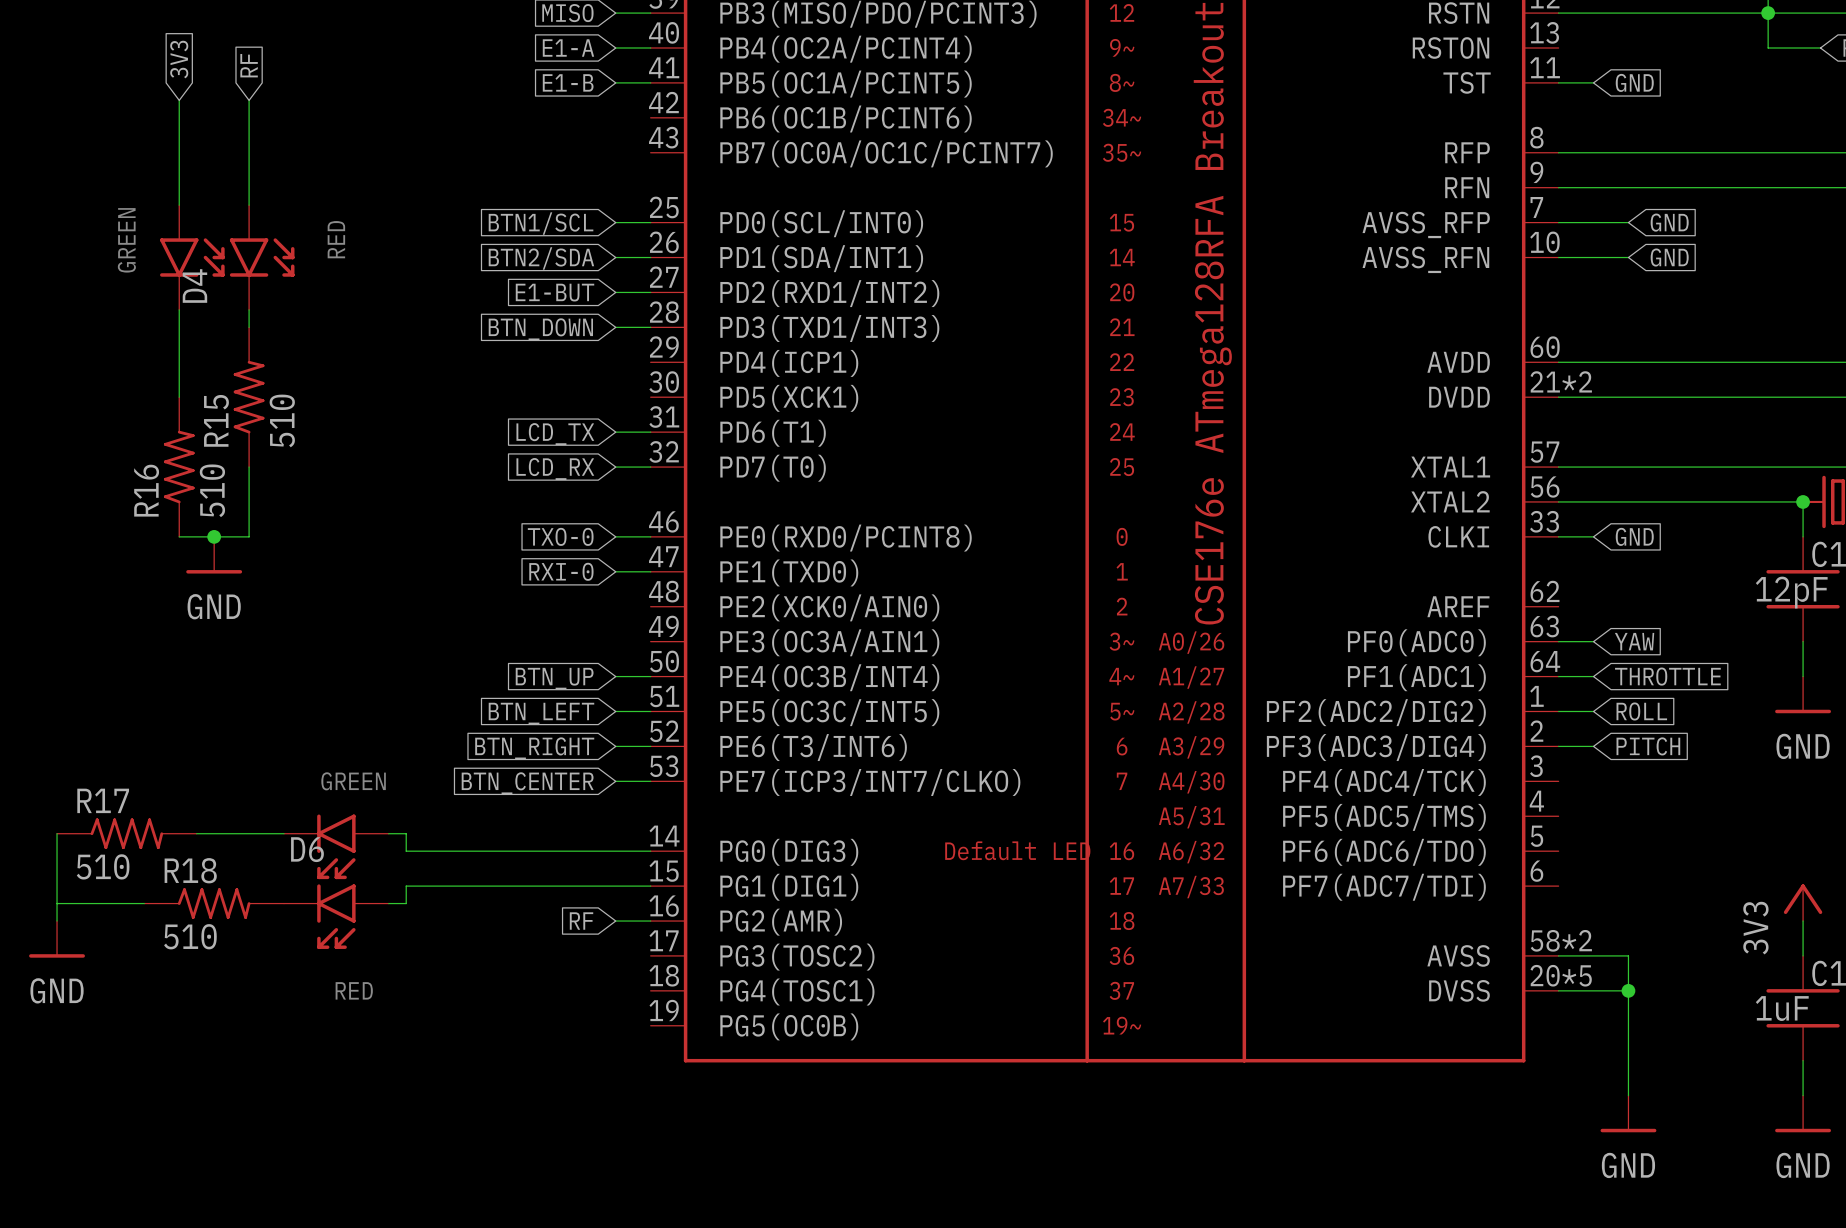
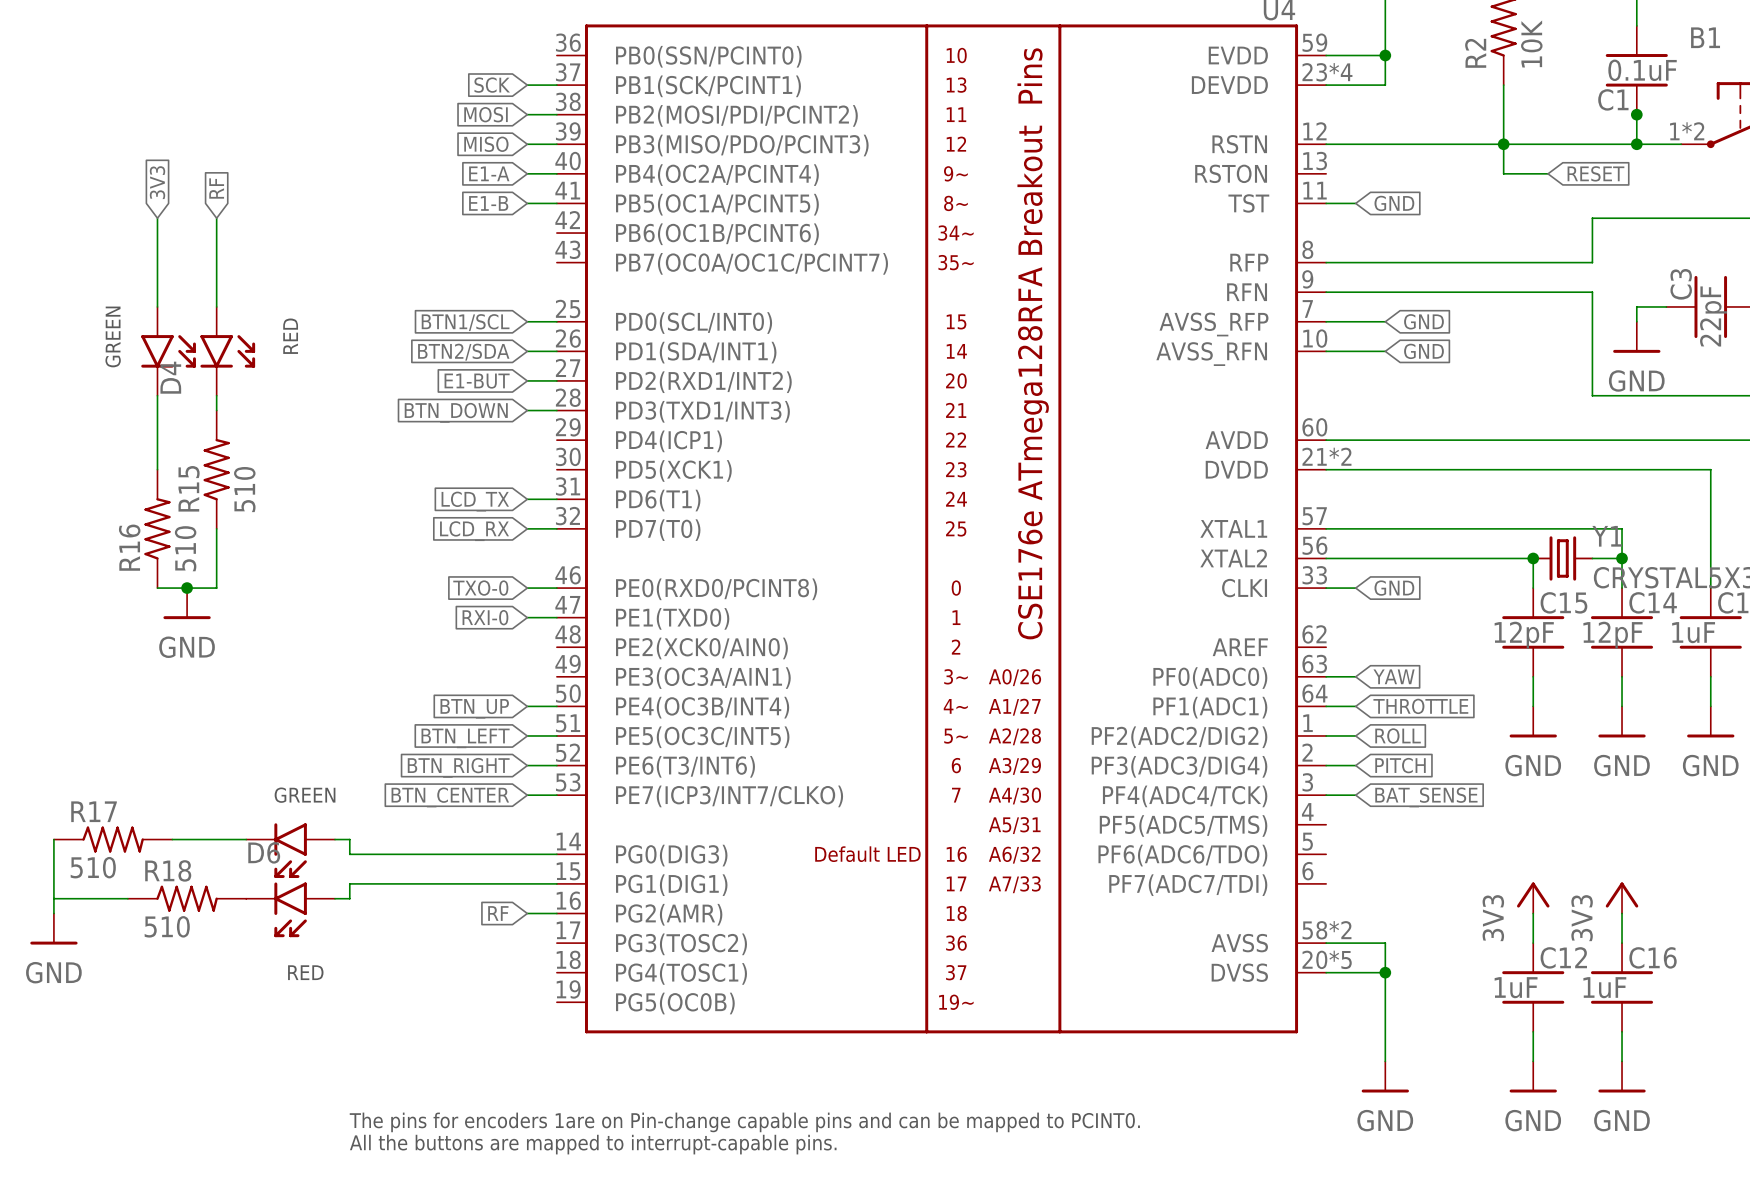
wire: none -> (1326, 795) (1355, 795)
global label: none -> BAT_SENSE (1426, 797)
text: none -> The pins for encoders 1are on Pin-change capable pins and can be mapped to PCINT0. (744, 1122)
text: none -> All the buttons are mapped to interrupt-capable pins. (593, 1144)

